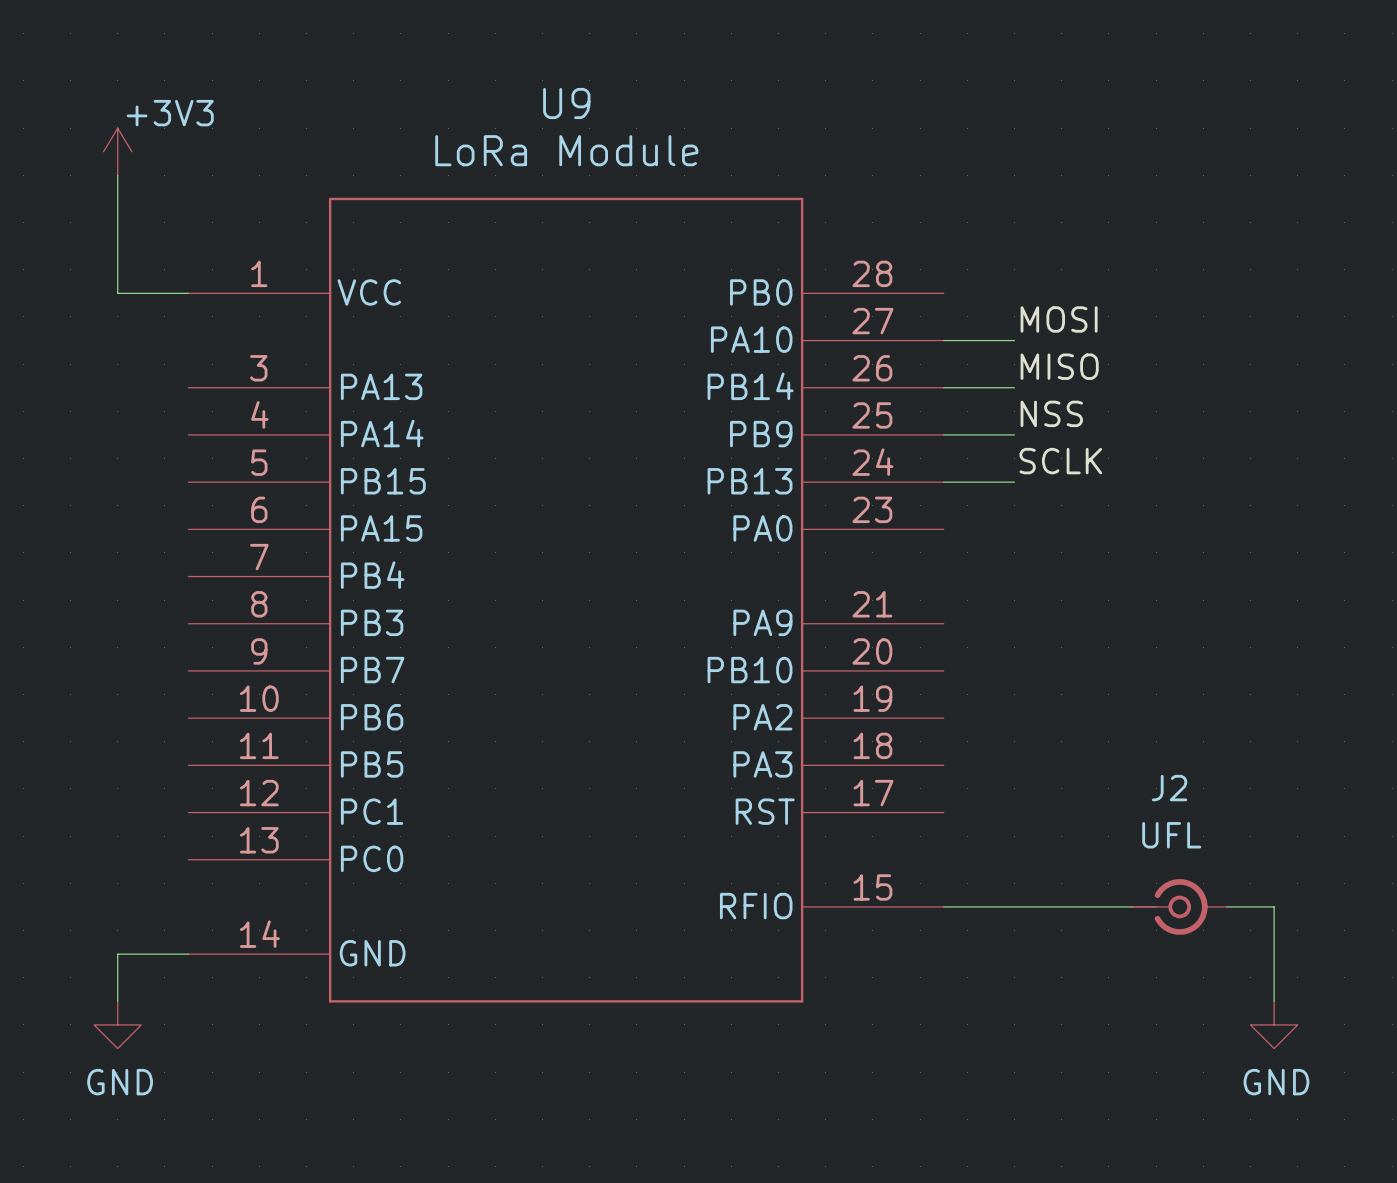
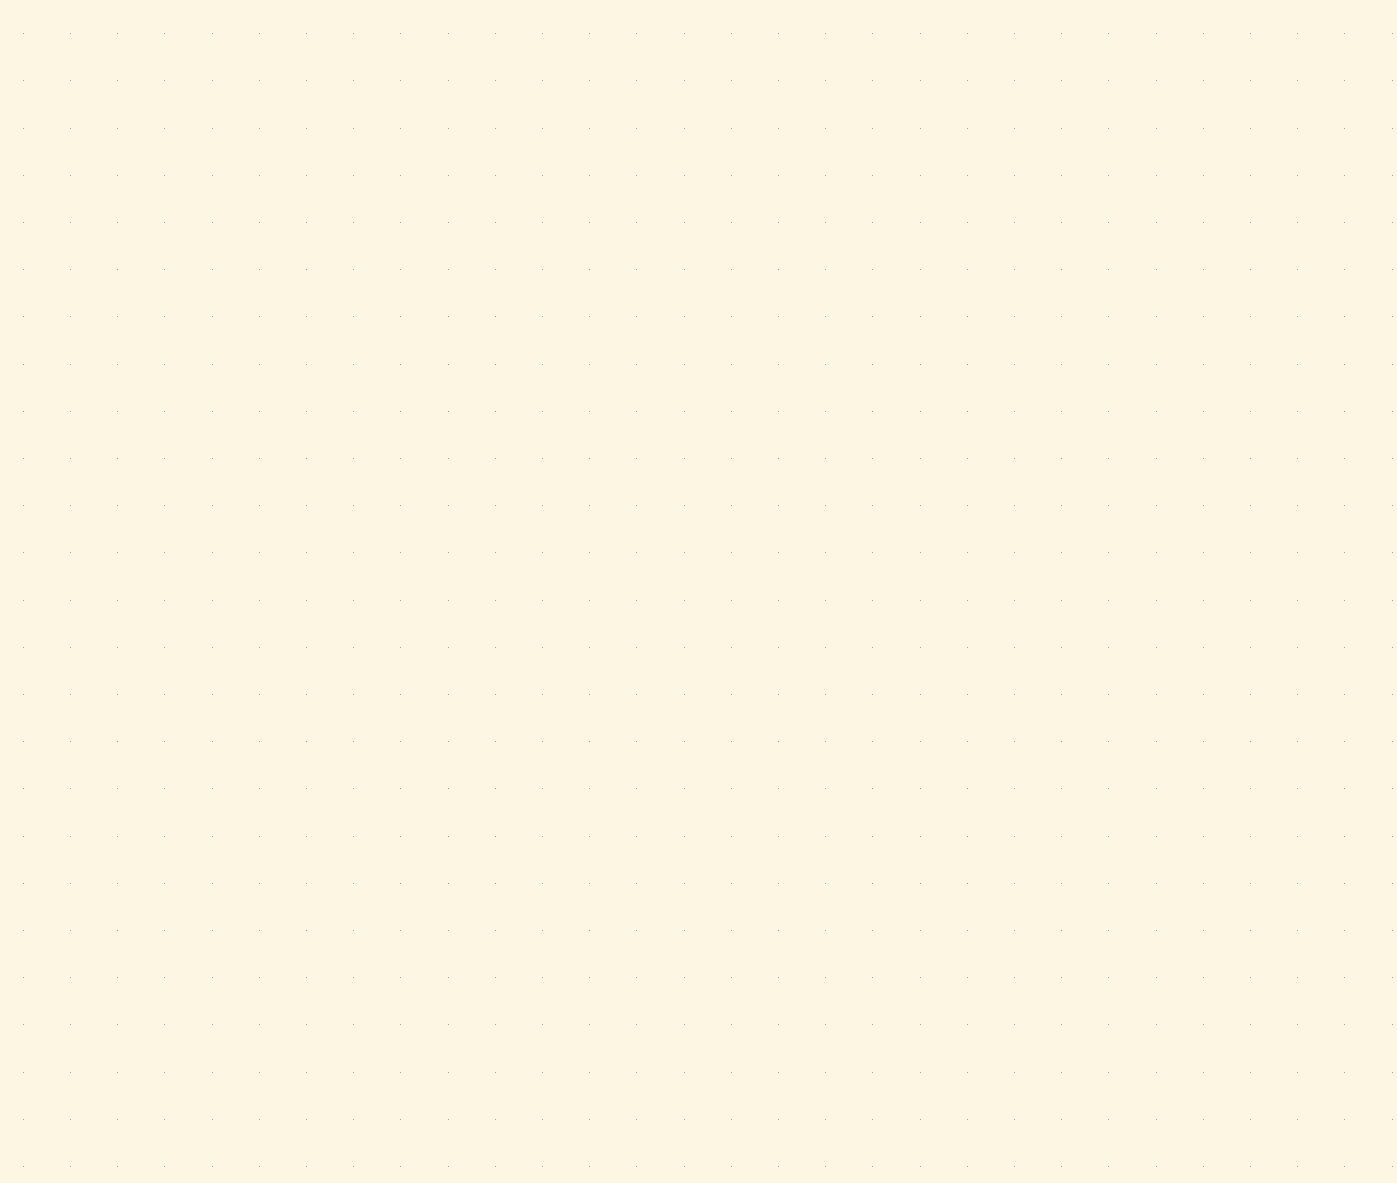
power symbol: +3V3 (117, 151) -> none
wire: (117, 175) (117, 293) (188, 293) -> none
label: MOSI (1059, 319) -> none
wire: (943, 340) (1014, 340) -> none
label: MISO (1059, 366) -> none
wire: (943, 387) (1014, 387) -> none
label: NSS (1051, 413) -> none
wire: (943, 434) (1014, 434) -> none
label: SCLK (1060, 461) -> none
wire: (943, 482) (1014, 482) -> none
U9: LoRa Module (566, 600) -> none
wire: (943, 906) (1132, 906) -> none
J2: UFL (1179, 906) -> none
wire: (1226, 906) (1274, 906) (1274, 1001) -> none
wire: (188, 954) (117, 954) (117, 1001) -> none
power symbol: GND (117, 1024) -> none
power symbol: GND (1274, 1024) -> none

